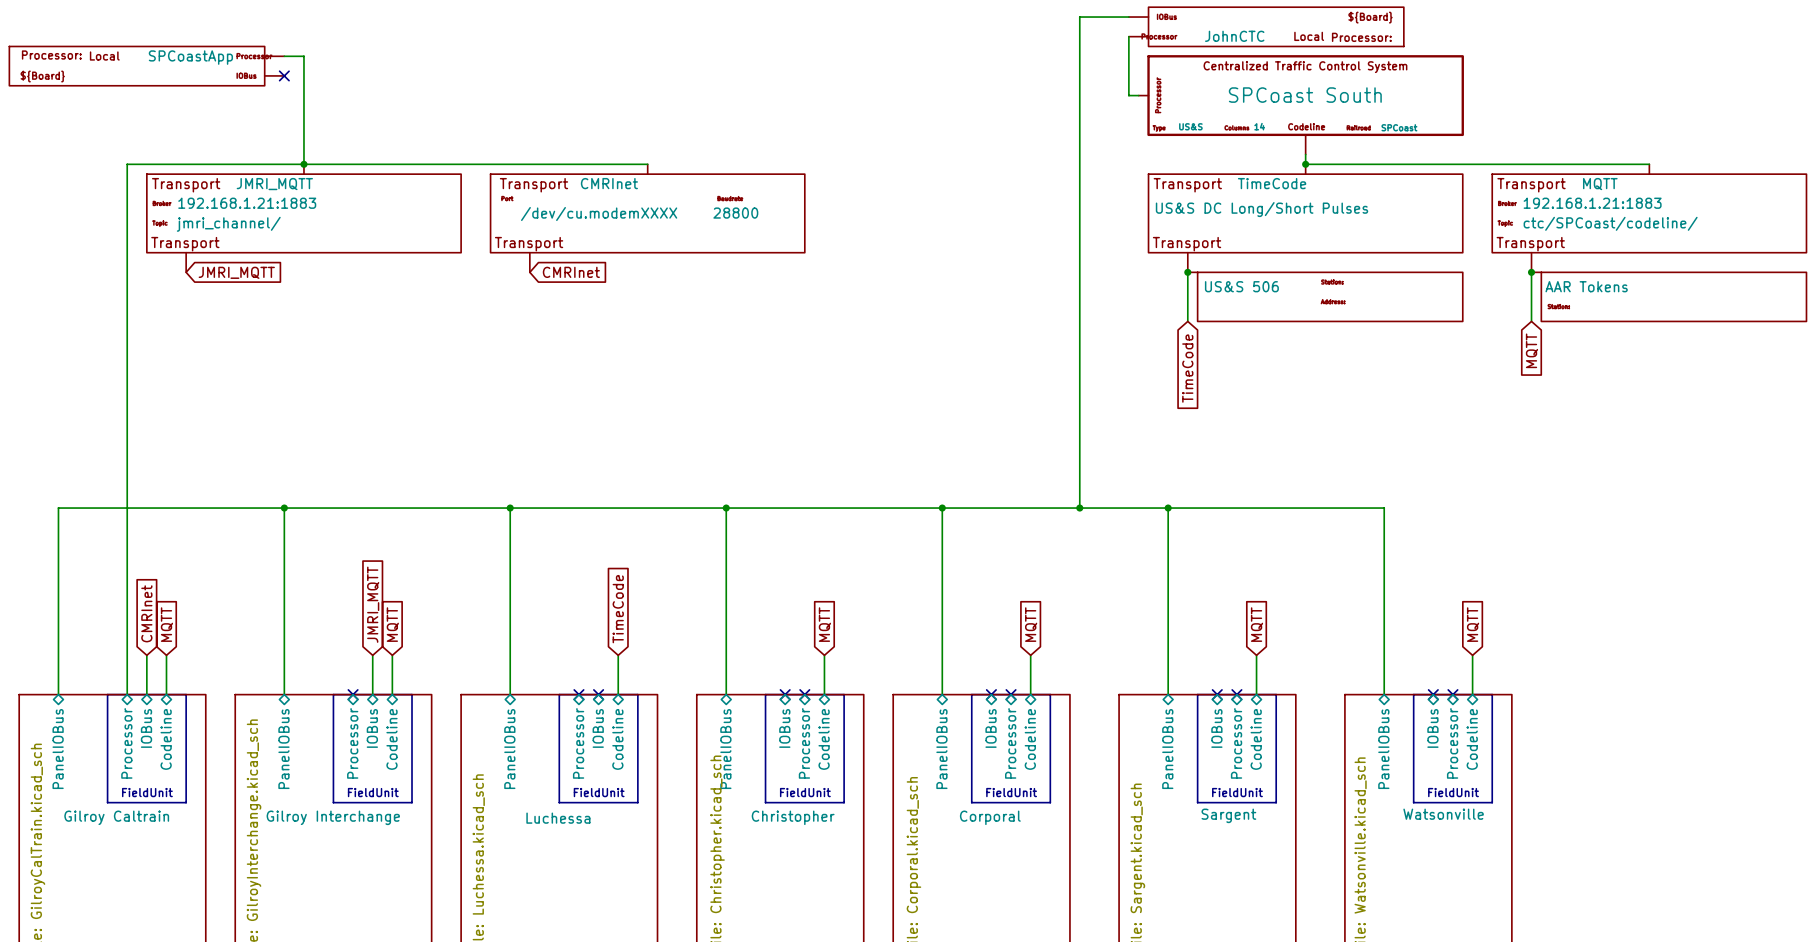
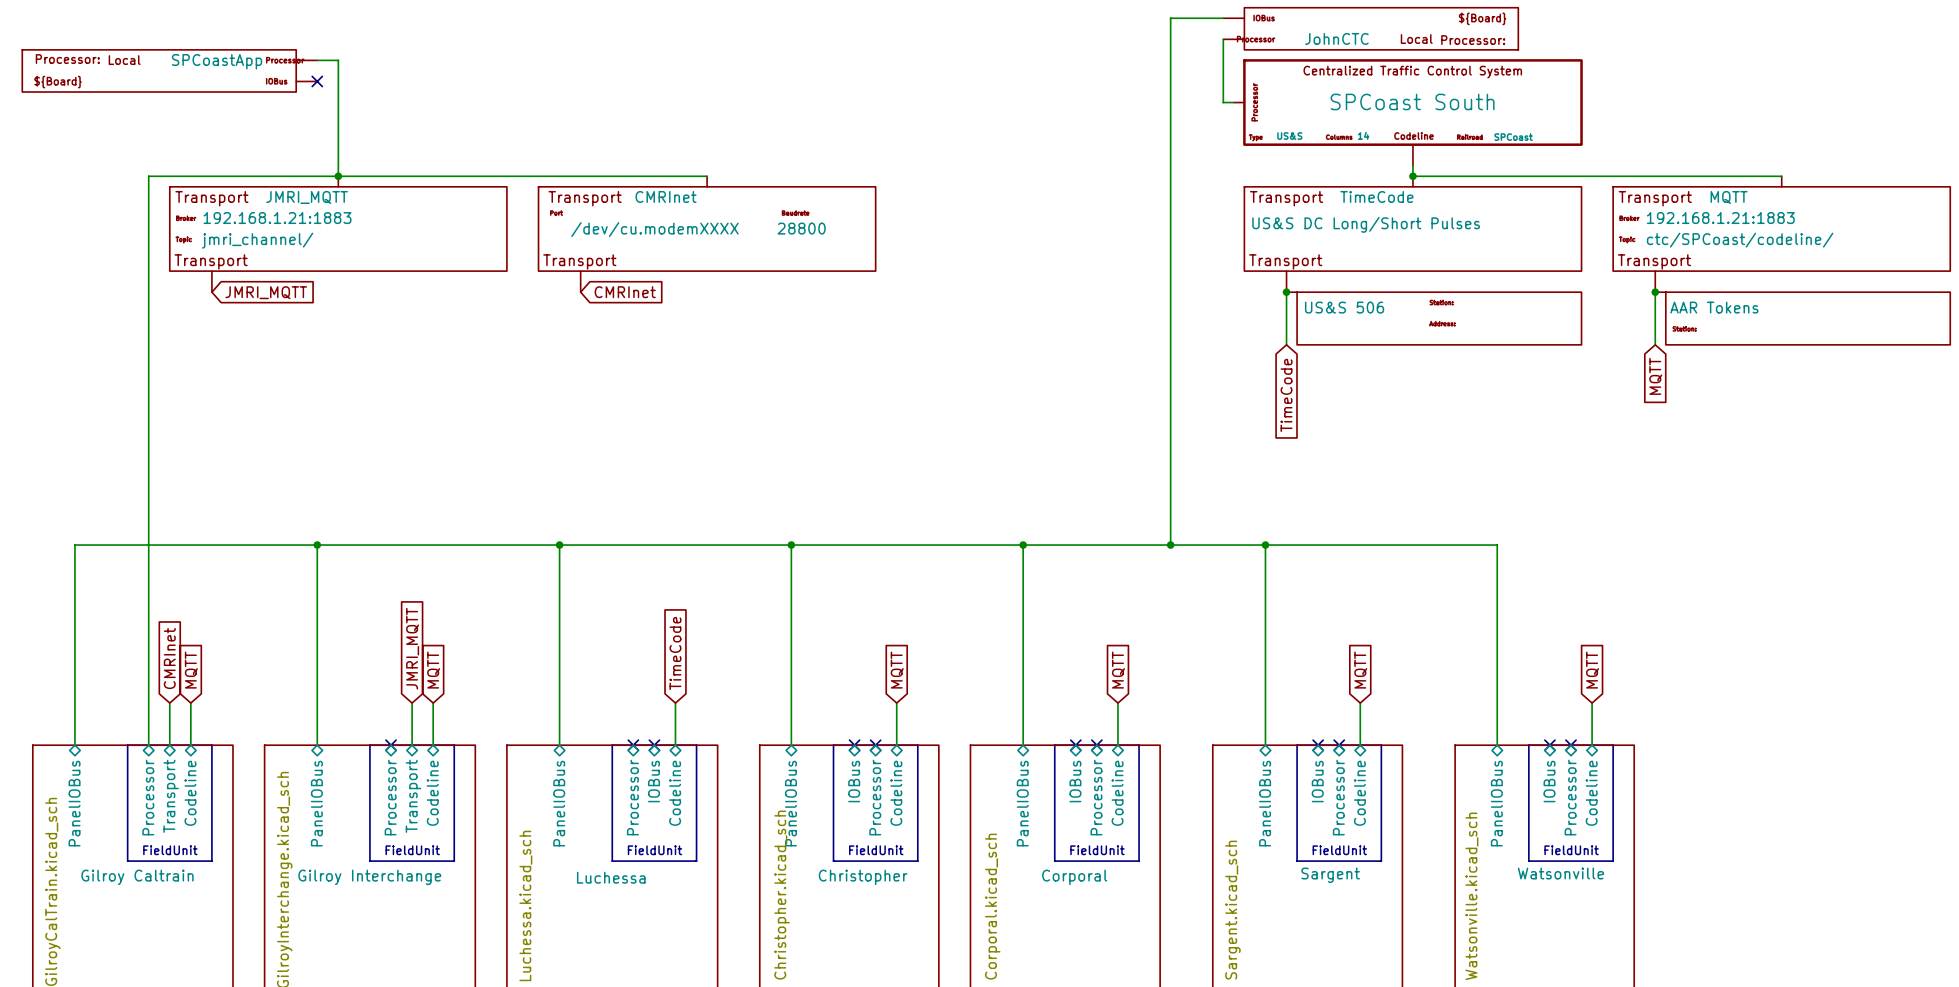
sheet pin: IOBus (146, 728) -> Transport (171, 796)
sheet pin: IOBus (372, 728) -> Transport (413, 796)

